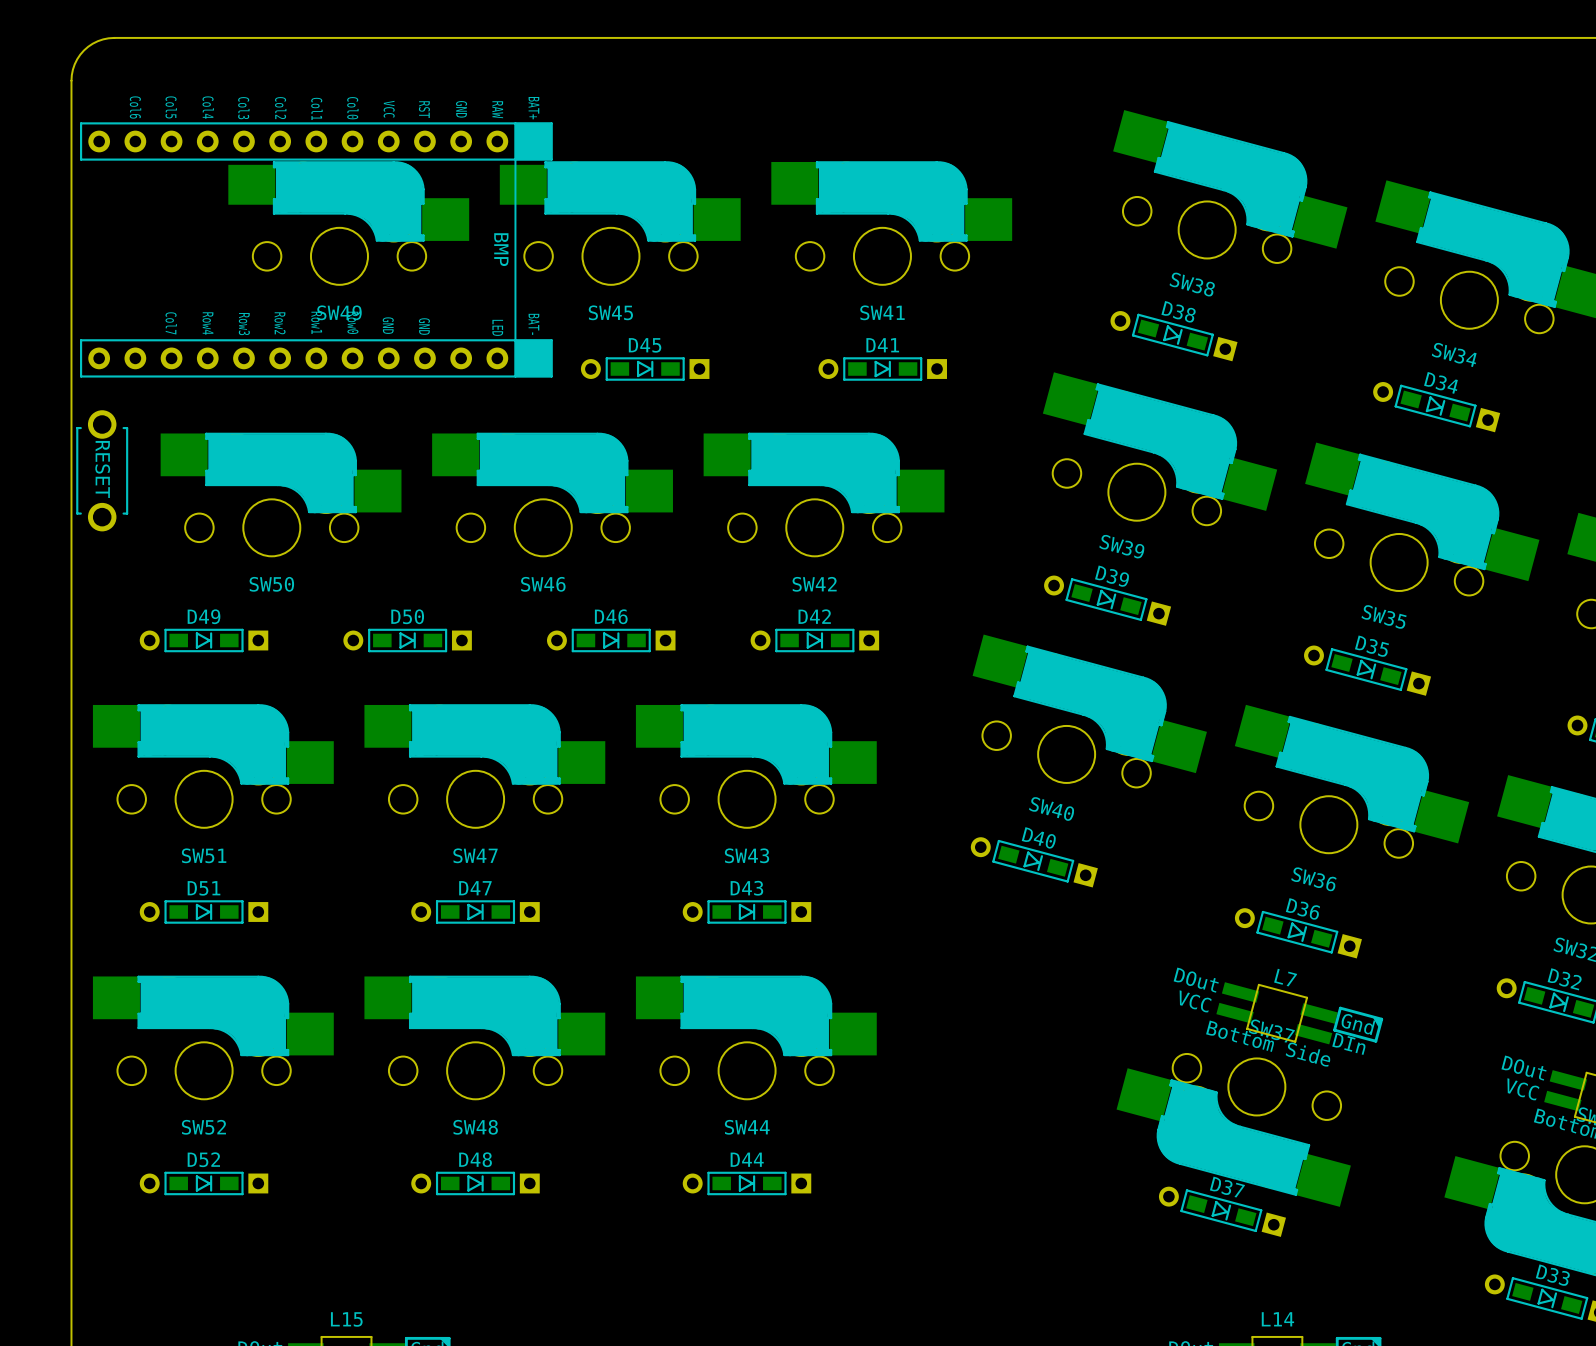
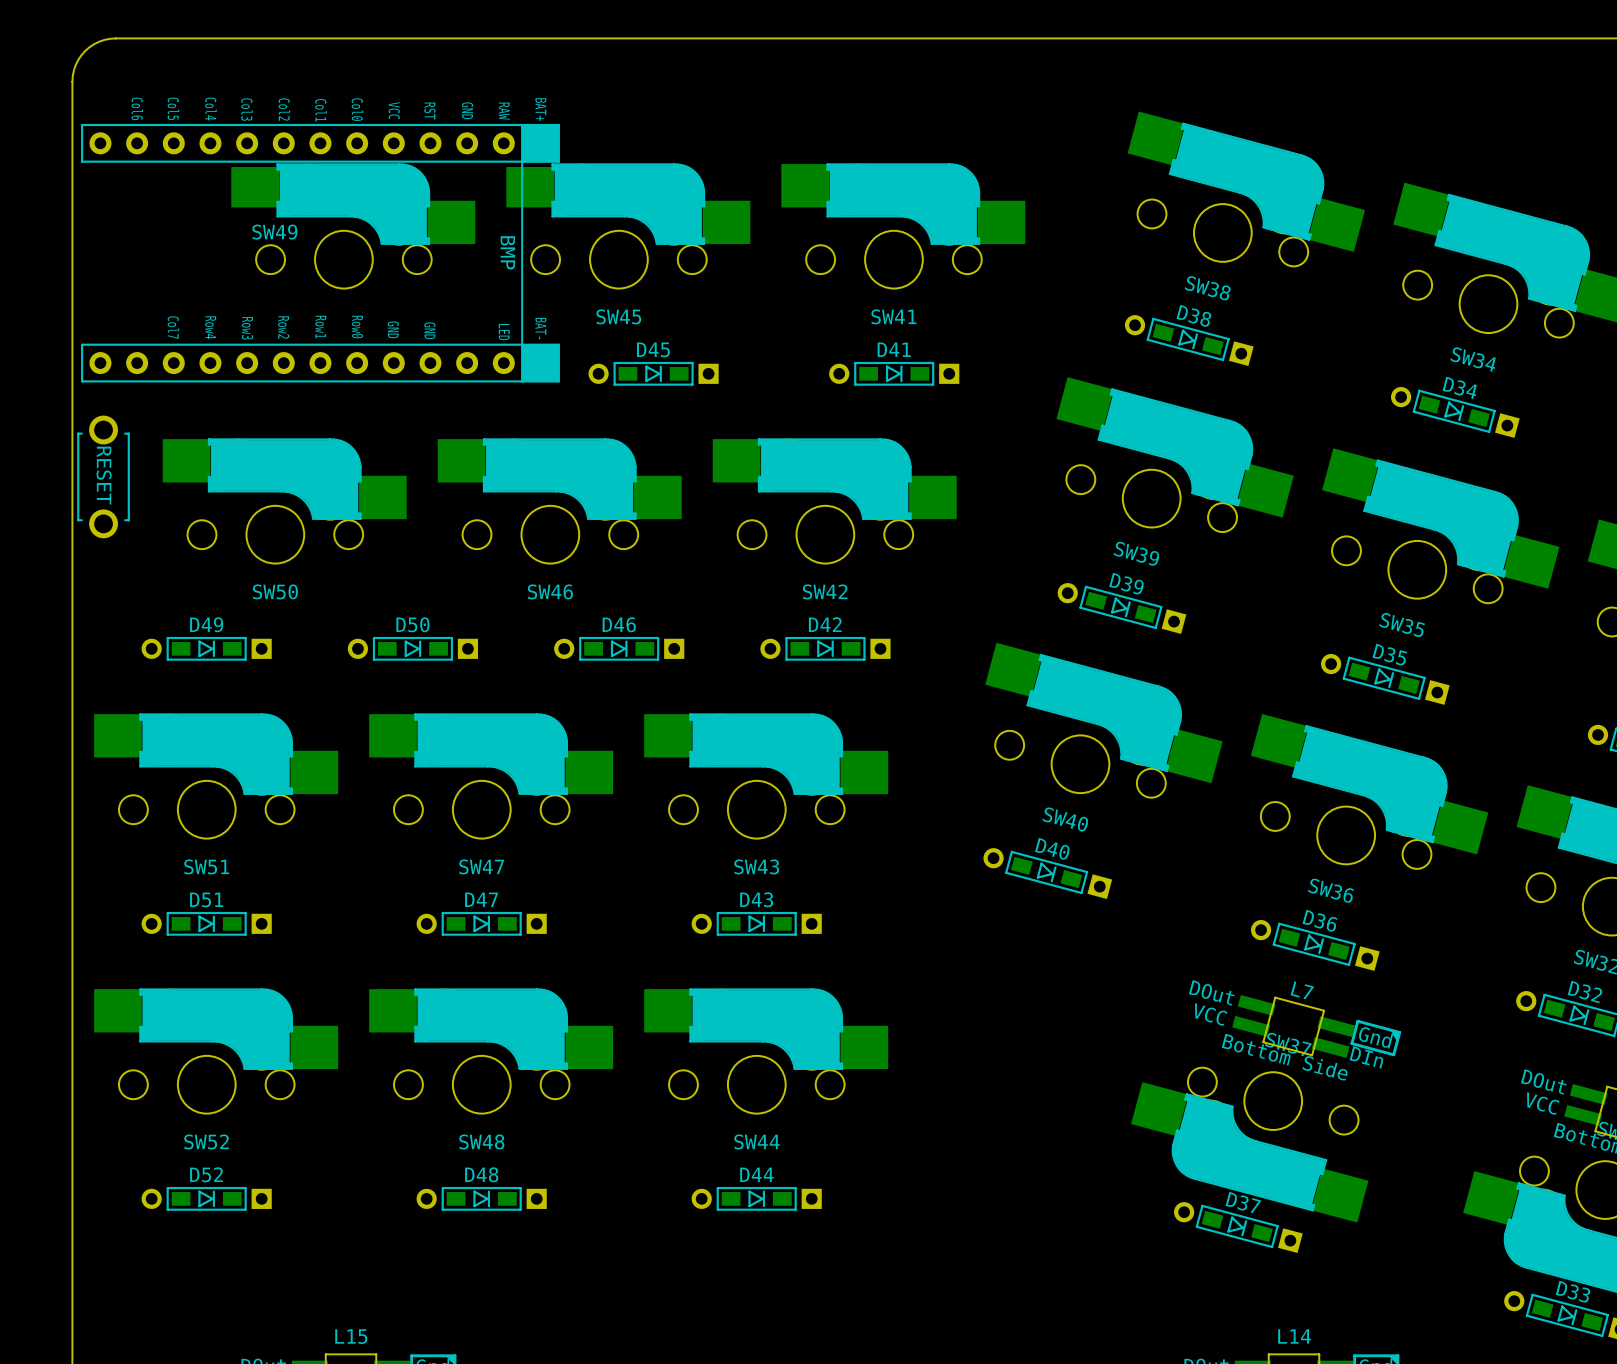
SW49 name position: SW49 (339, 312) -> SW49 (274, 232)

